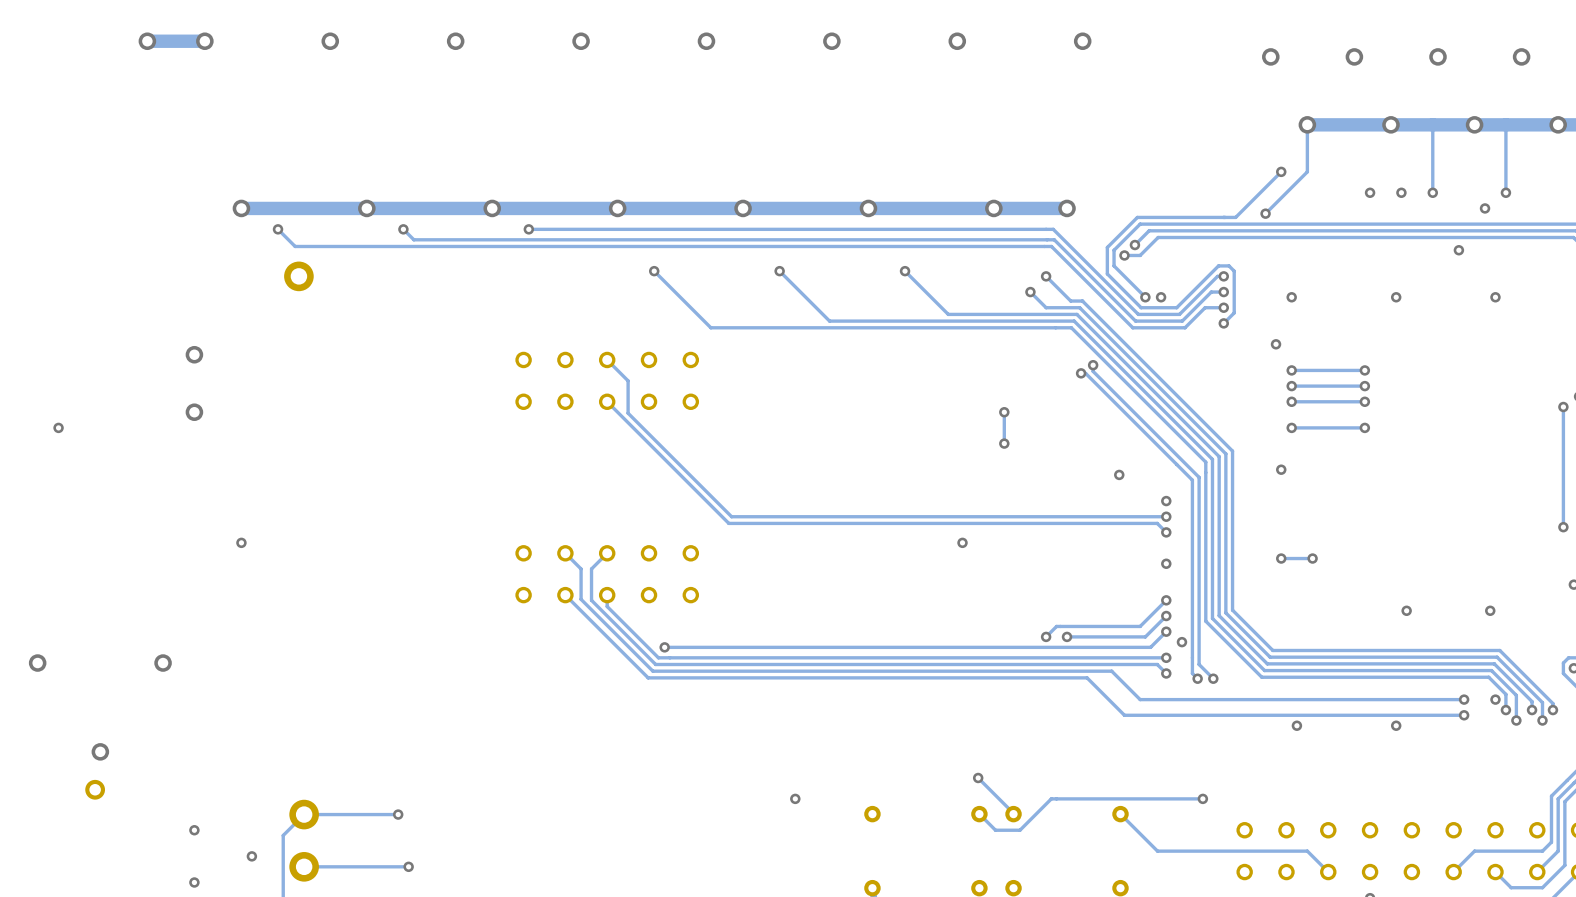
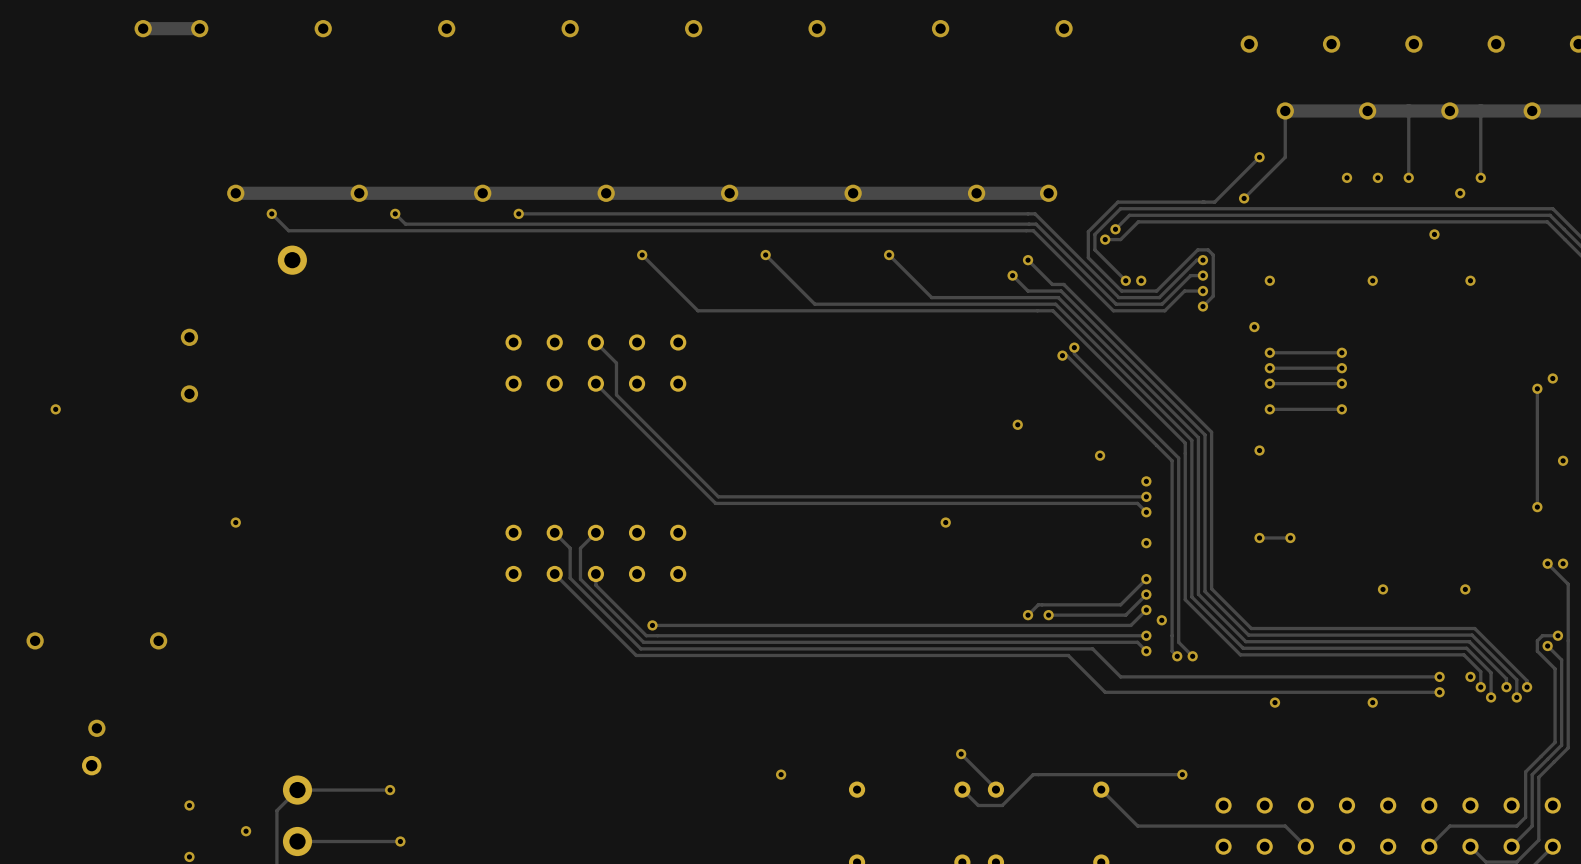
track: (1004, 412) (1004, 443) -> none
via: (1004, 412) -> none
via: (1004, 443) -> none
via: none -> (1017, 424)

